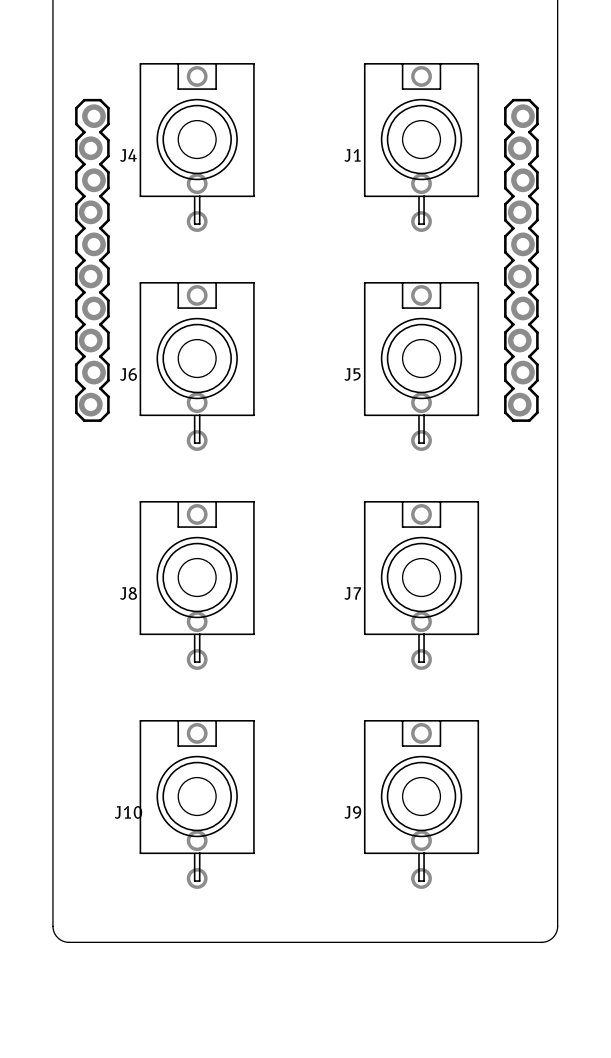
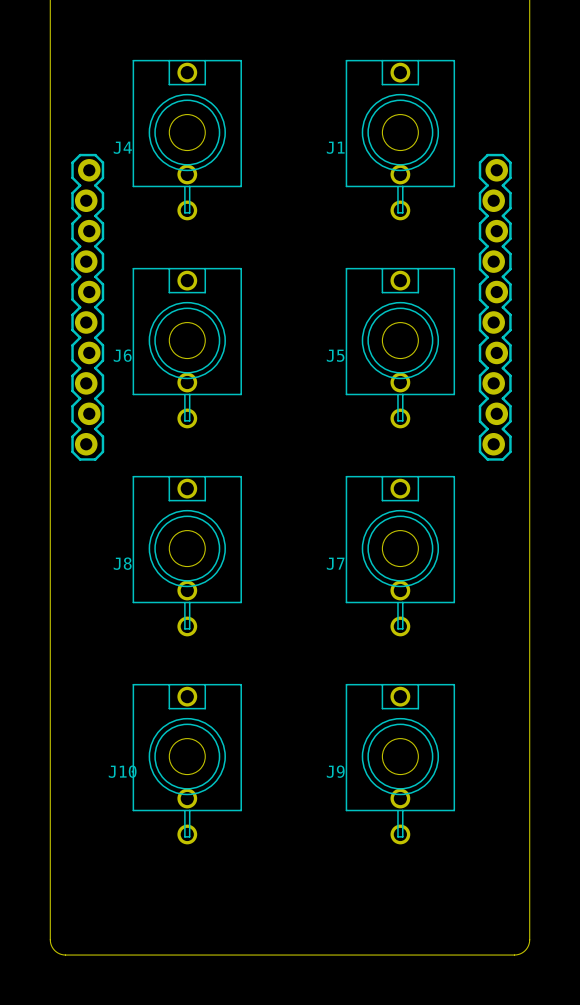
part position: (92, 260) -> (87, 307)
part position: (521, 260) -> (495, 307)
board edge: (52, 926) (57, 937) (69, 942) (541, 942) (552, 937) (557, 926) -> (50, 879) (50, 941) (54, 950) (63, 954) (514, 955) (523, 951) (529, 943) (529, 879)

